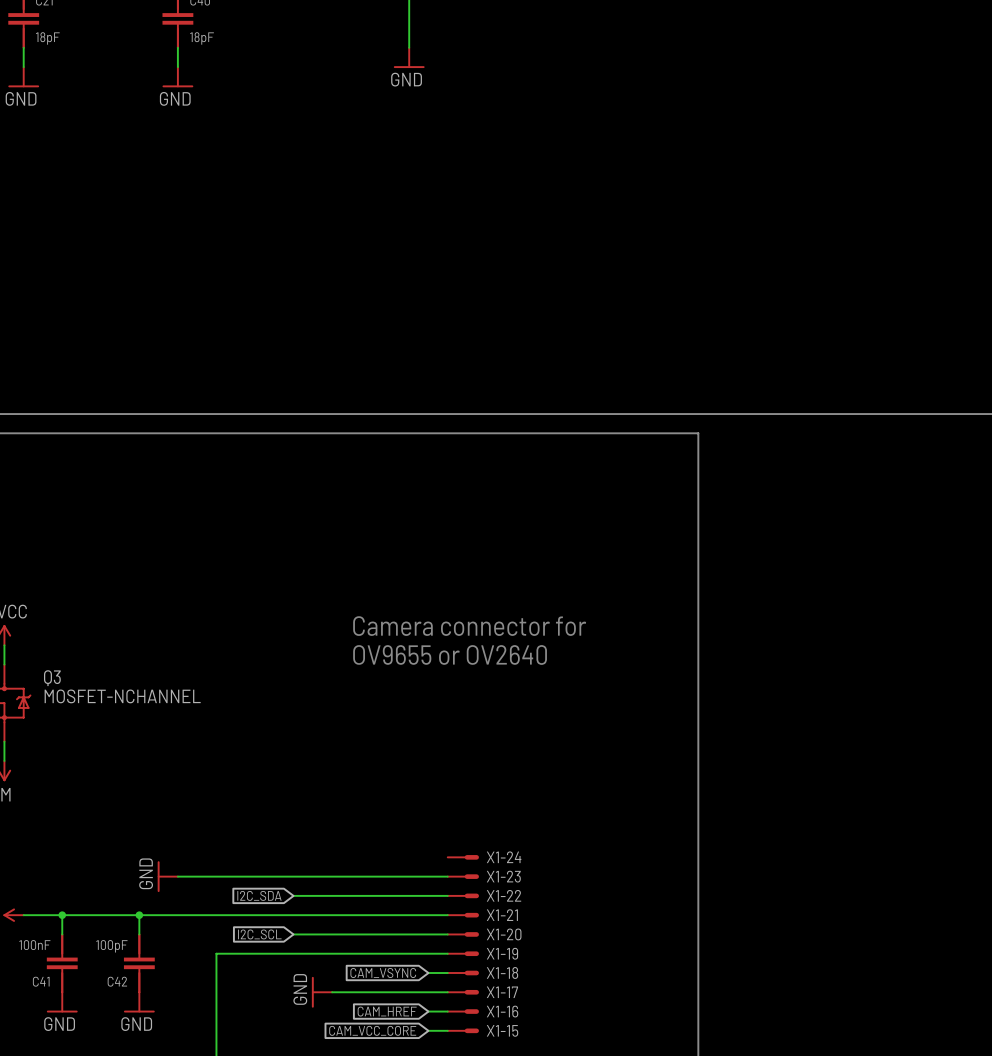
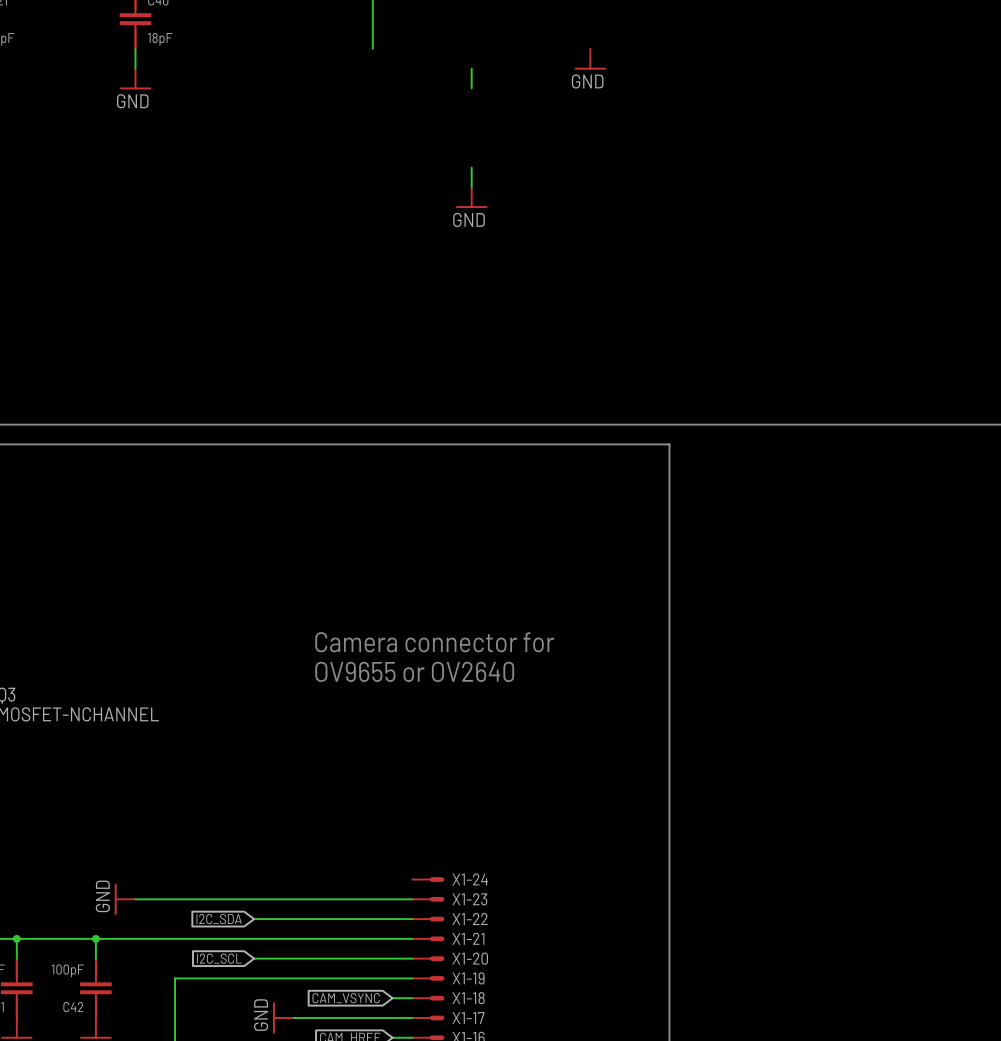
power symbol: GND (409, 57) -> none
power symbol: none -> GND (590, 59)
wire: none -> (471, 68) (471, 88)
wire: none -> (471, 167) (471, 187)
power symbol: none -> GND (471, 197)

